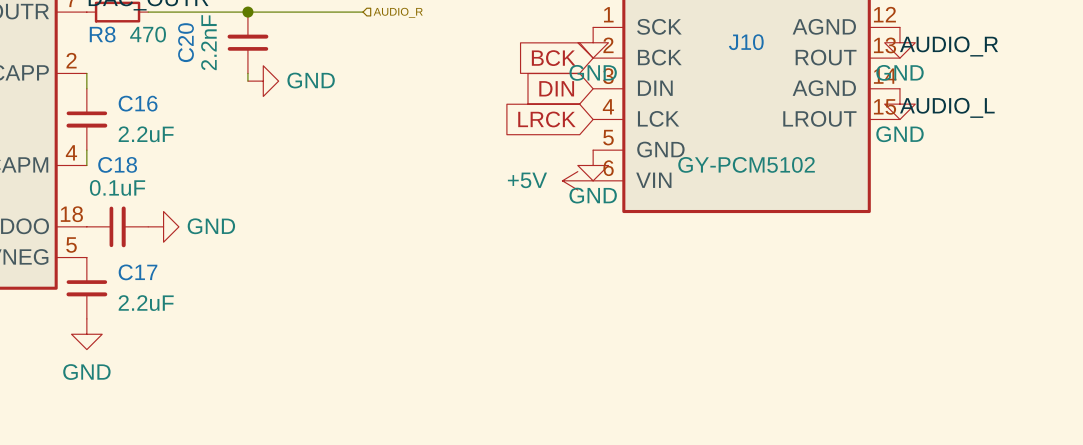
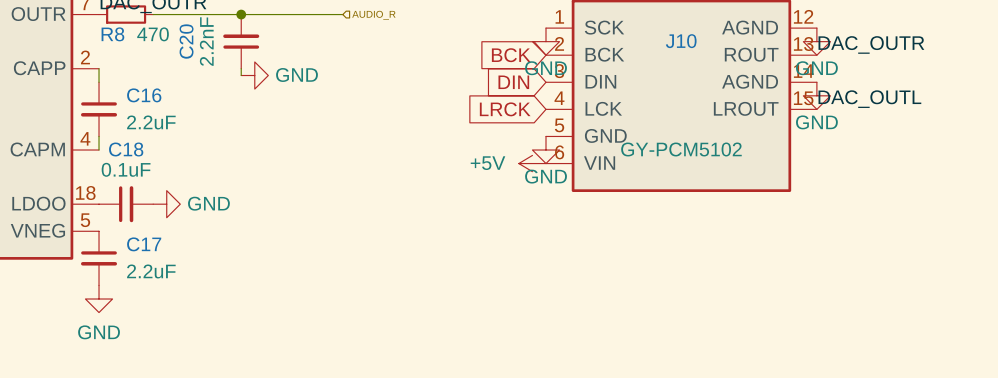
label: AUDIO_R (949, 46) -> DAC_OUTR (871, 44)
label: AUDIO_L (947, 107) -> DAC_OUTL (869, 99)

